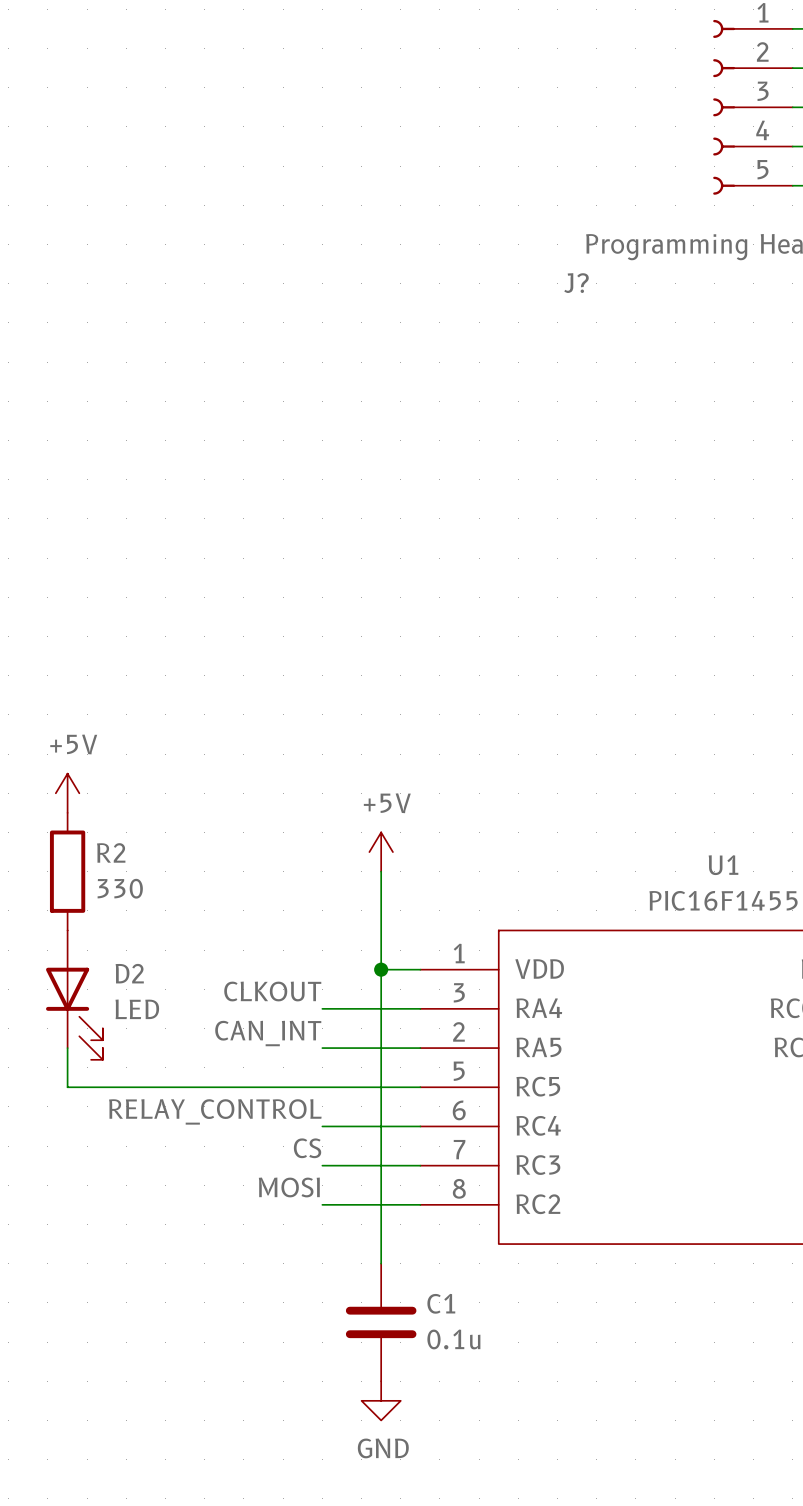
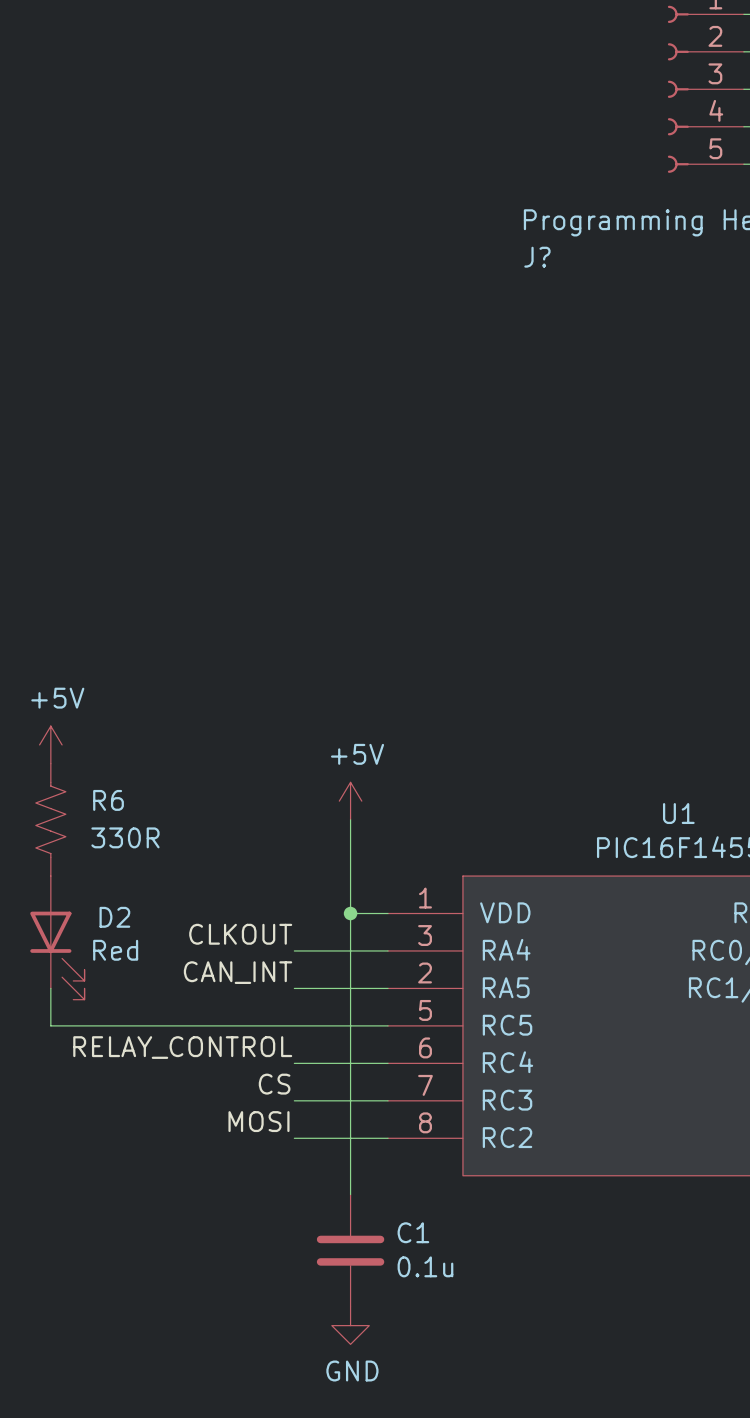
R2: 330 (67, 871) -> none
R6: none -> 330R (50, 819)
D2 value: LED (137, 1009) -> Red (115, 950)

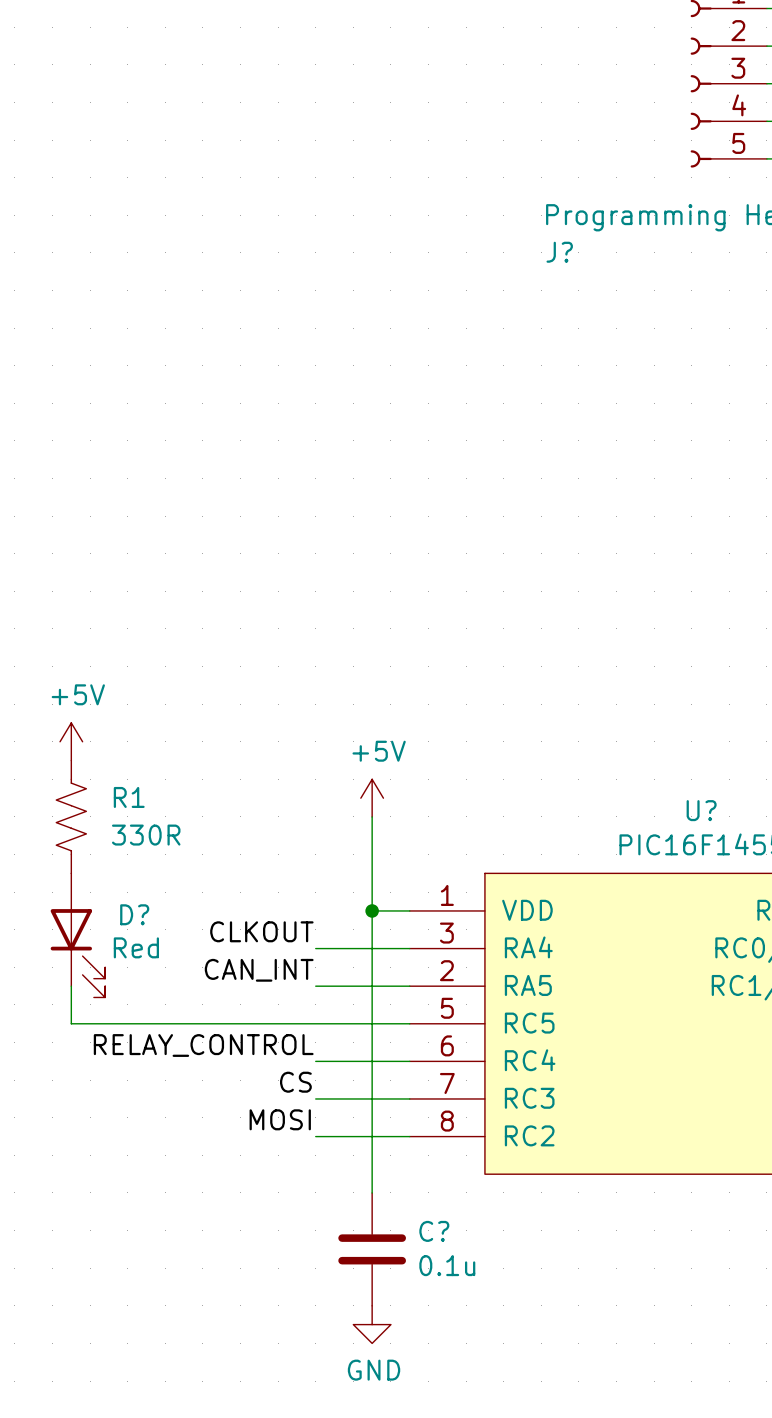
R6 name: R6 (108, 800) -> R1 (129, 797)
U1 name: U1 (678, 813) -> U? (701, 810)
D2 name: D2 (114, 917) -> D? (134, 914)
C1 name: C1 (413, 1232) -> C? (434, 1231)

